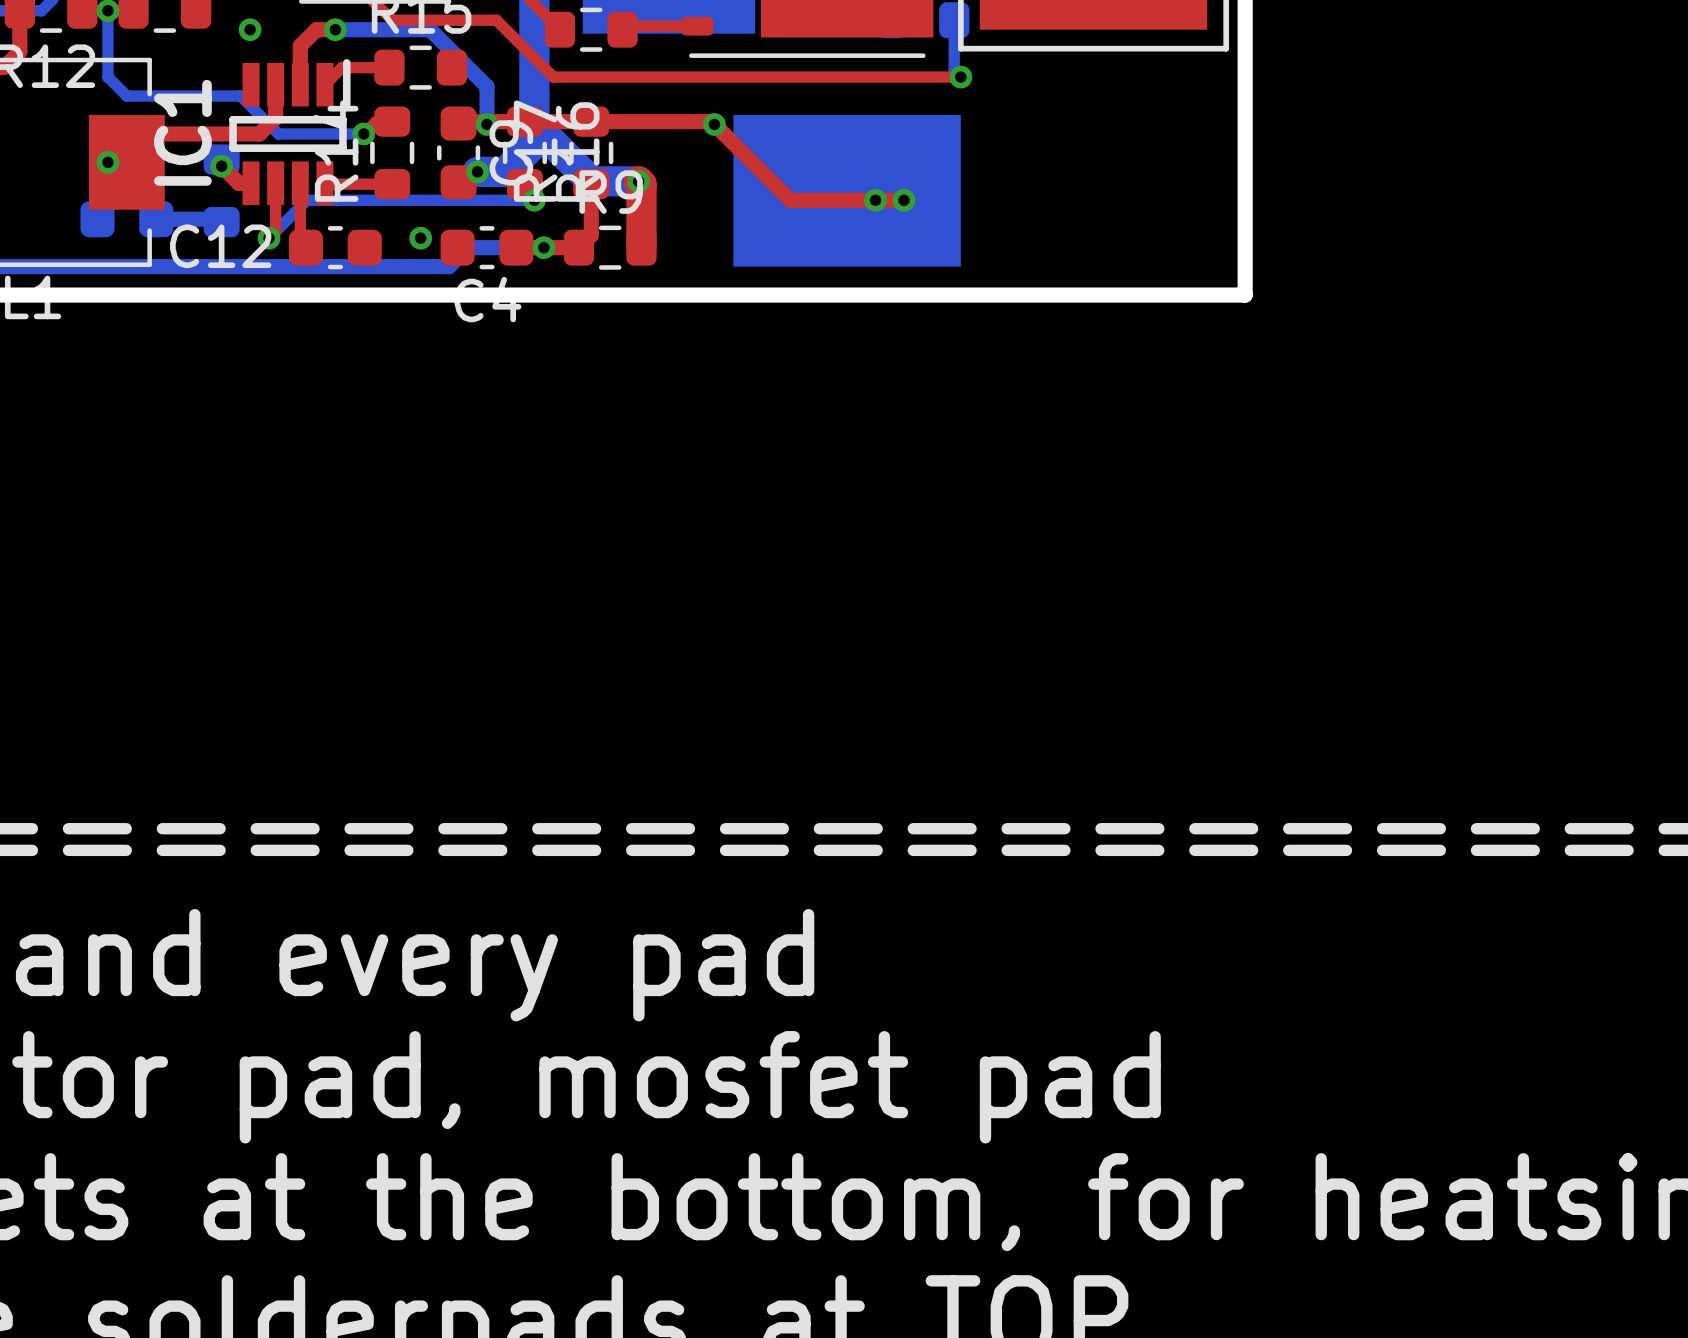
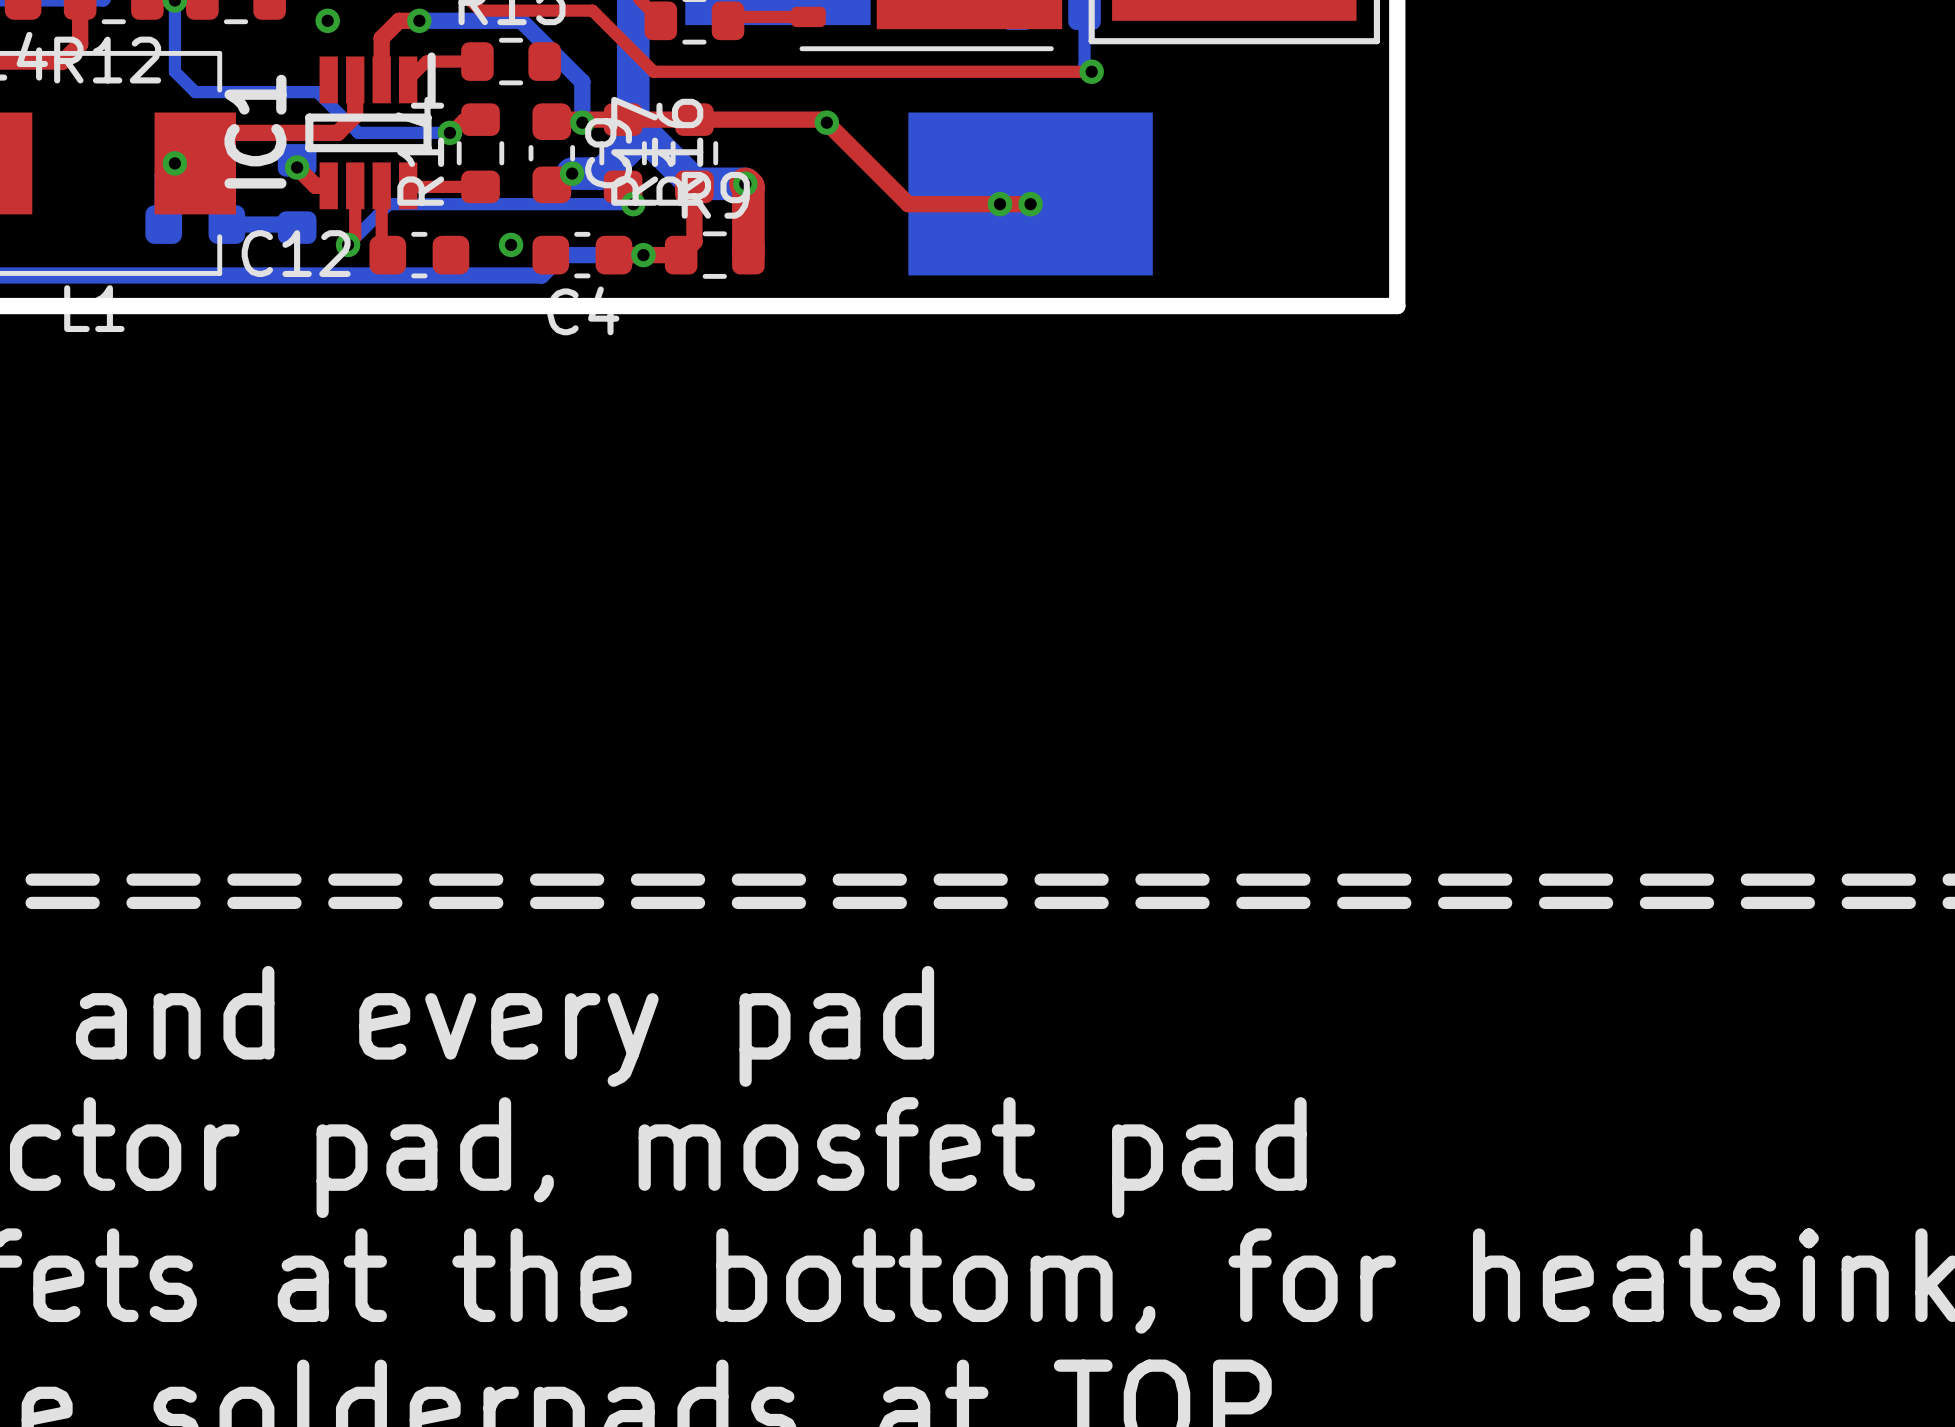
part position: (847, 190) -> (1030, 193)

